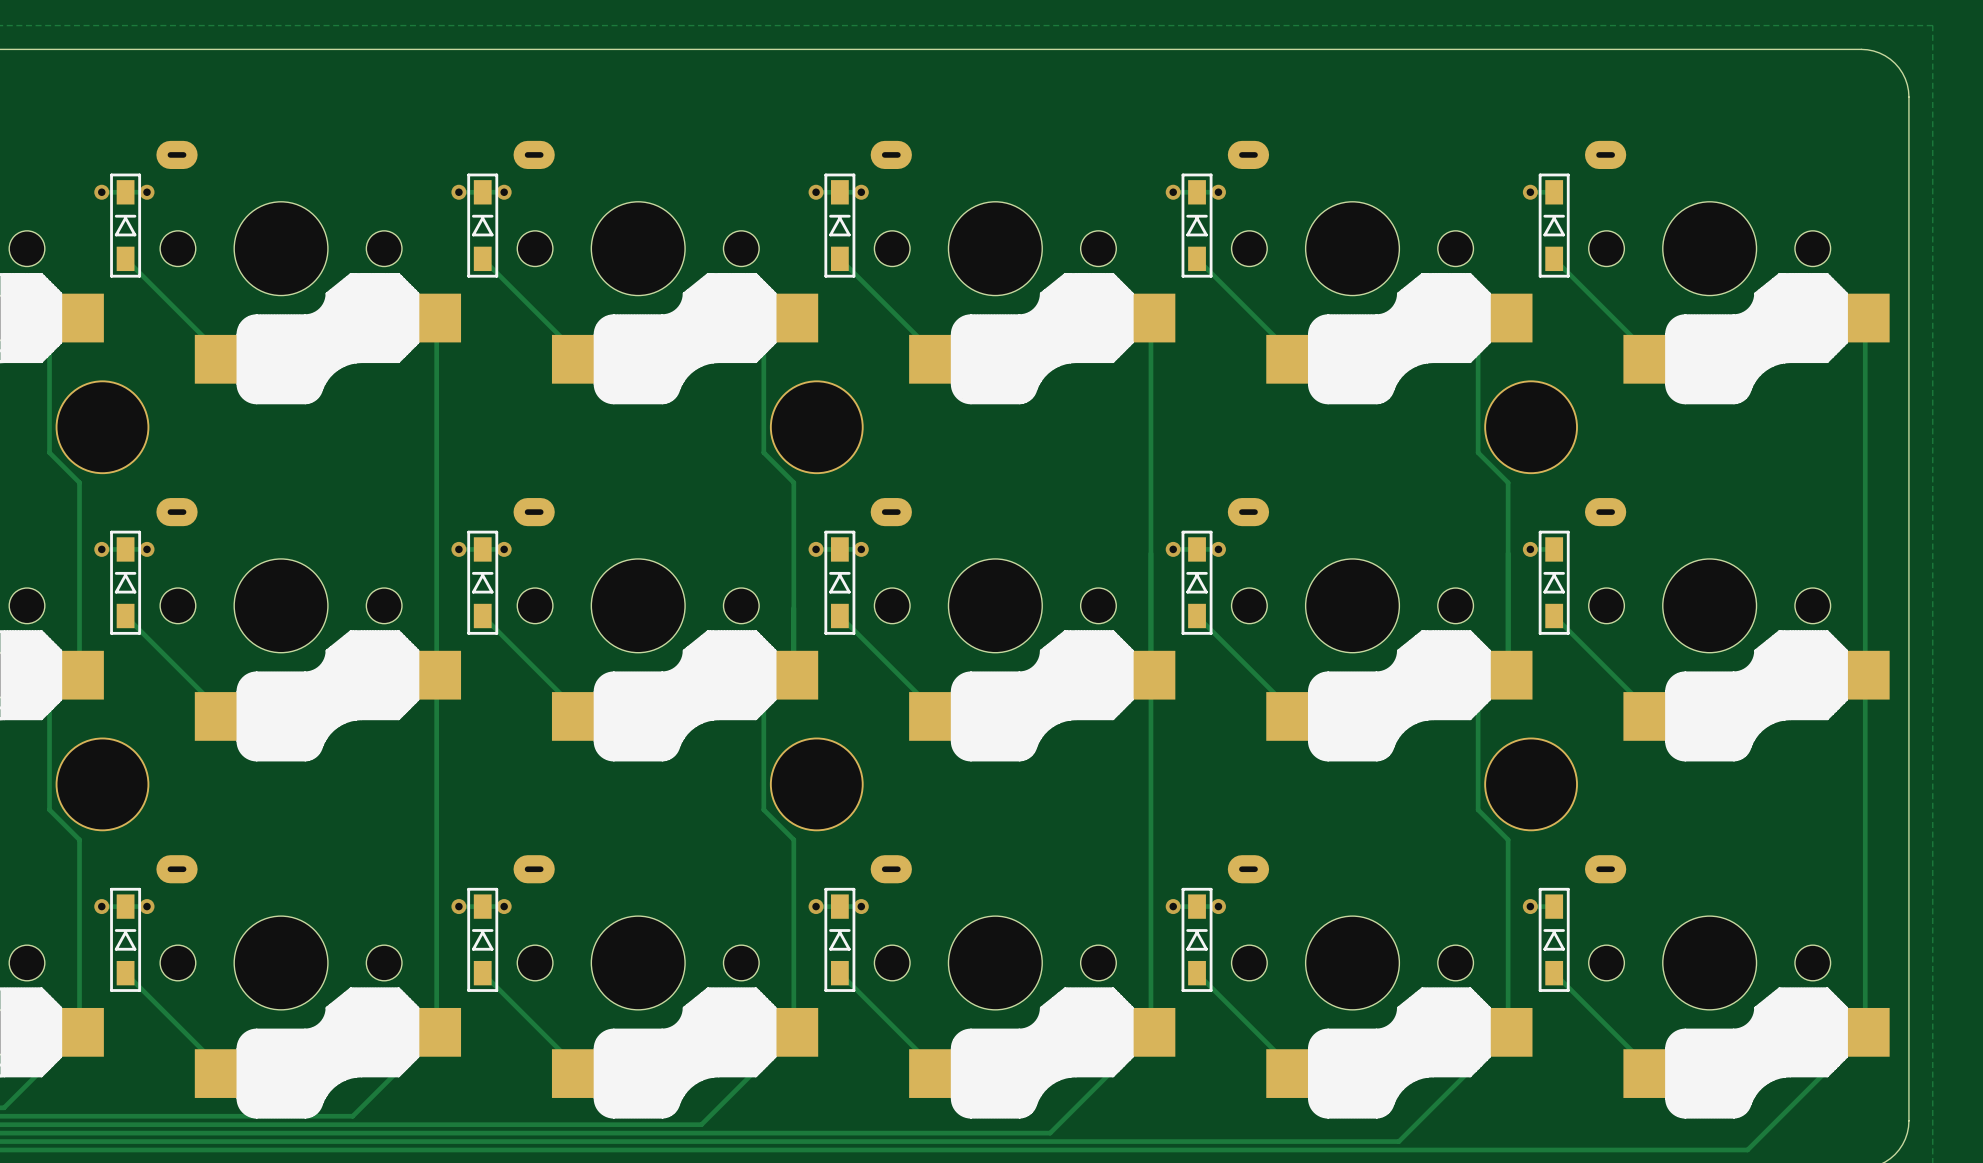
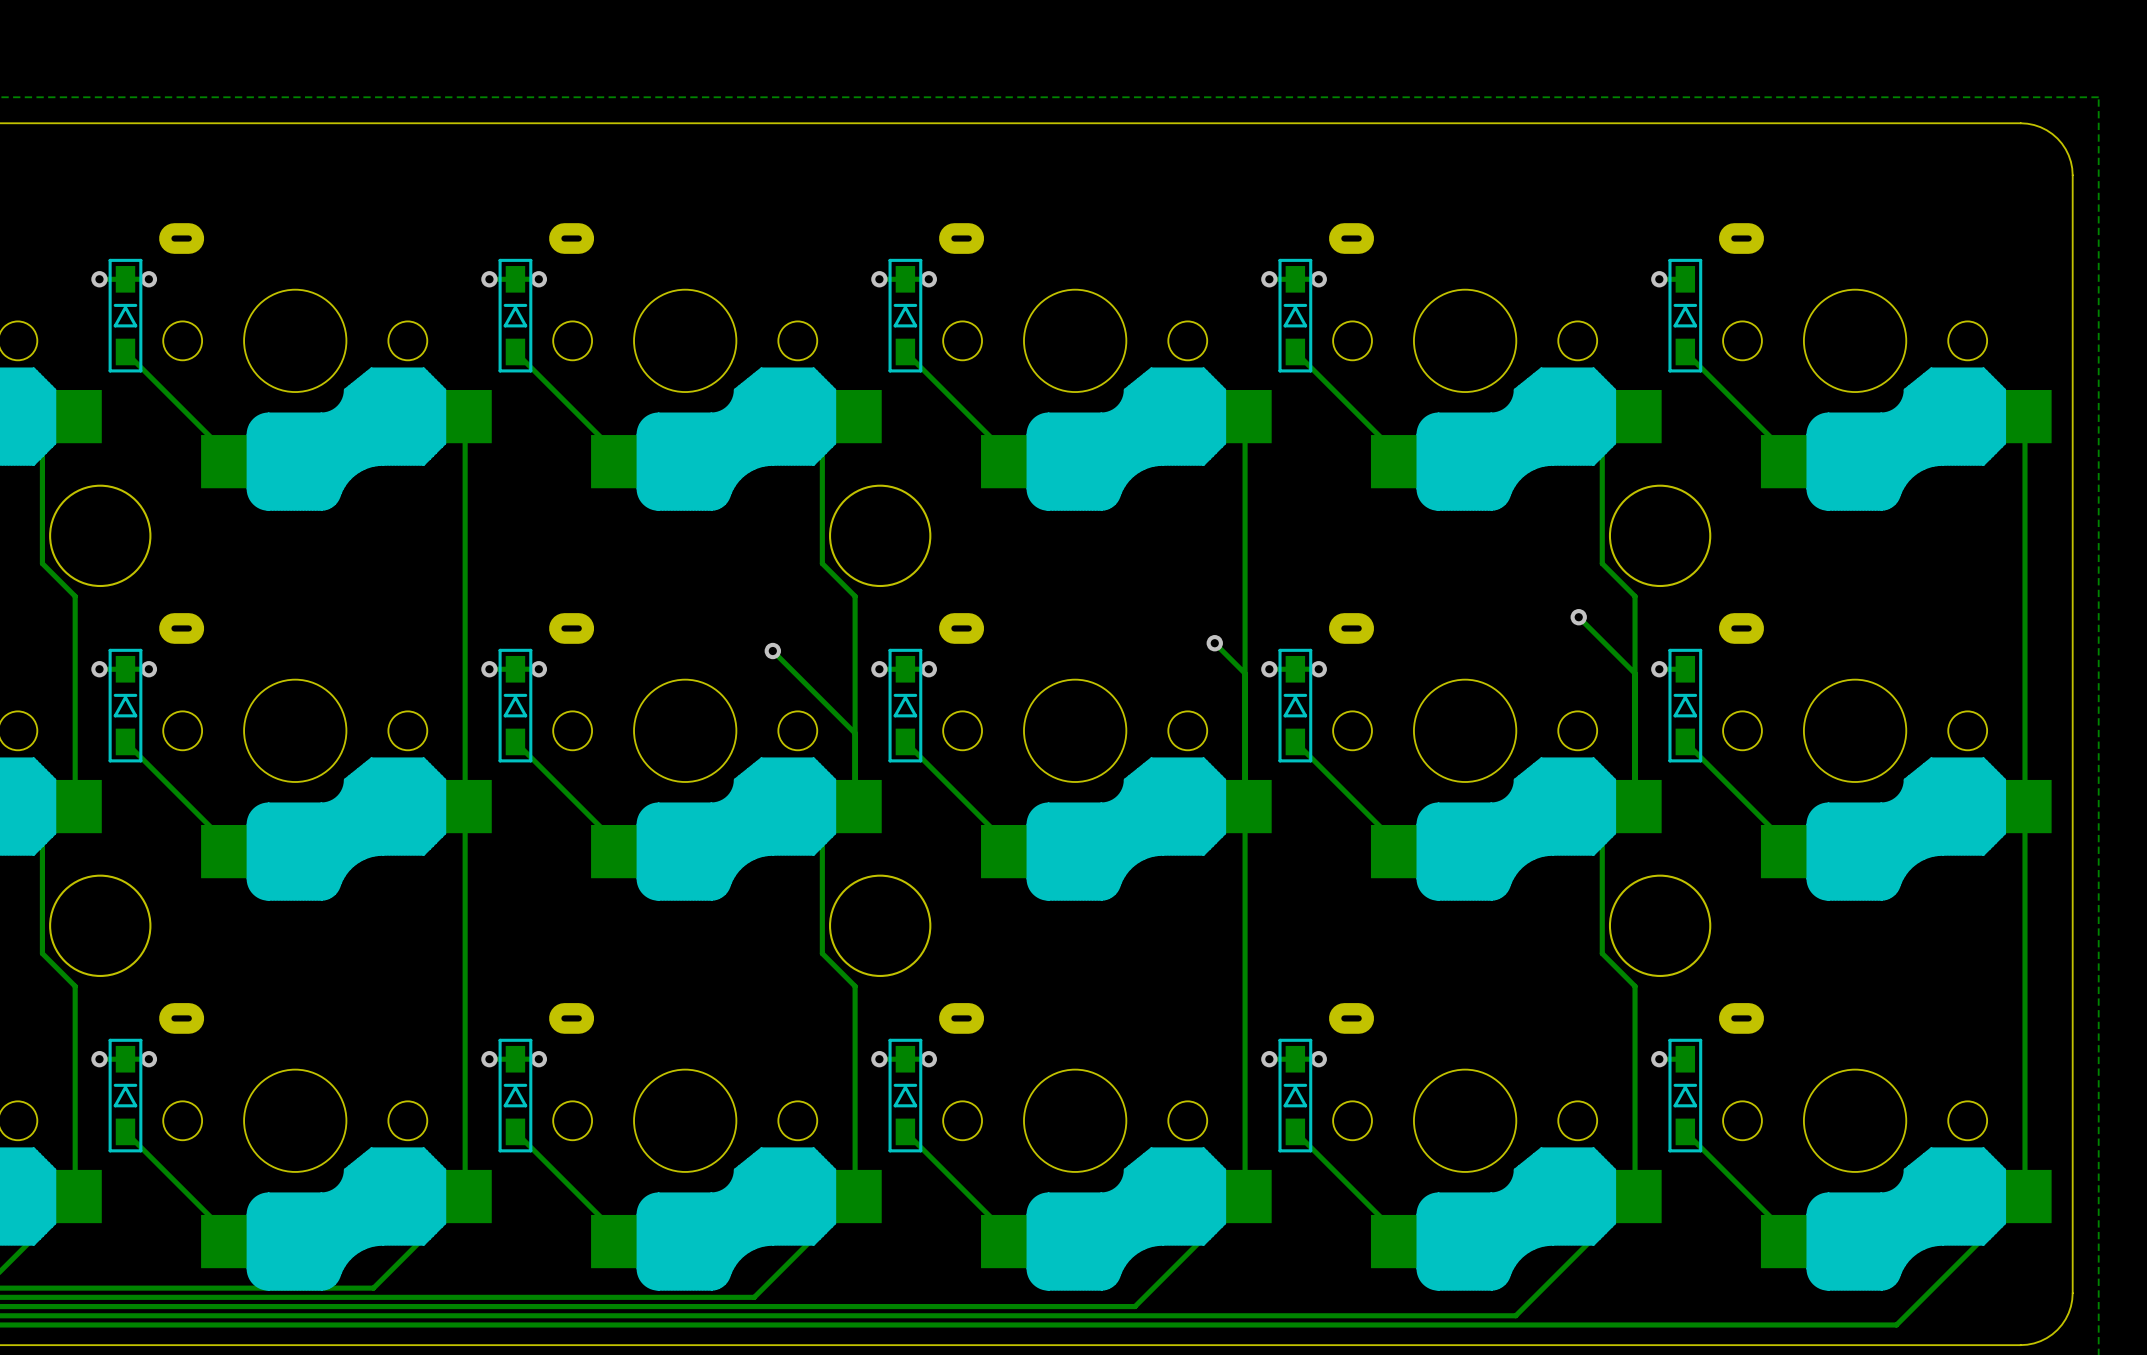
track: none -> (1578, 617) (1635, 673)
via: none -> (1578, 617)
track: none -> (1214, 643) (1245, 673)
via: none -> (1214, 643)
track: none -> (772, 651) (855, 733)
via: none -> (772, 651)

